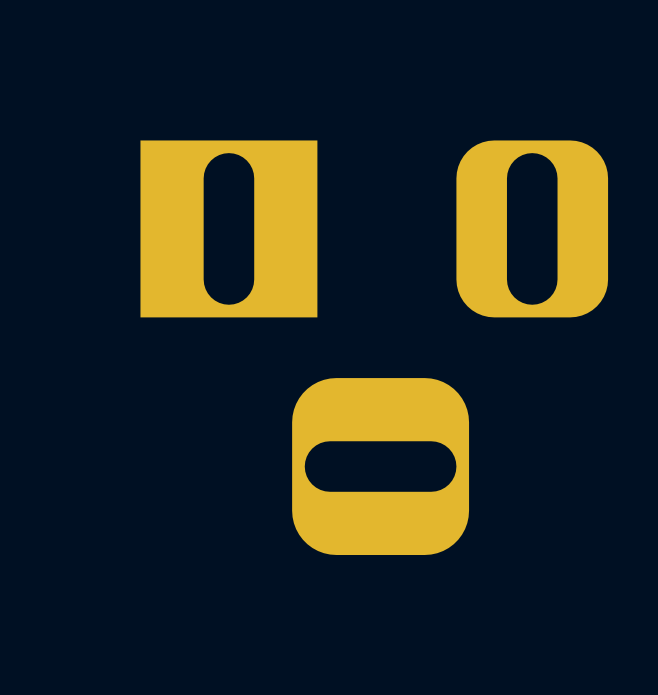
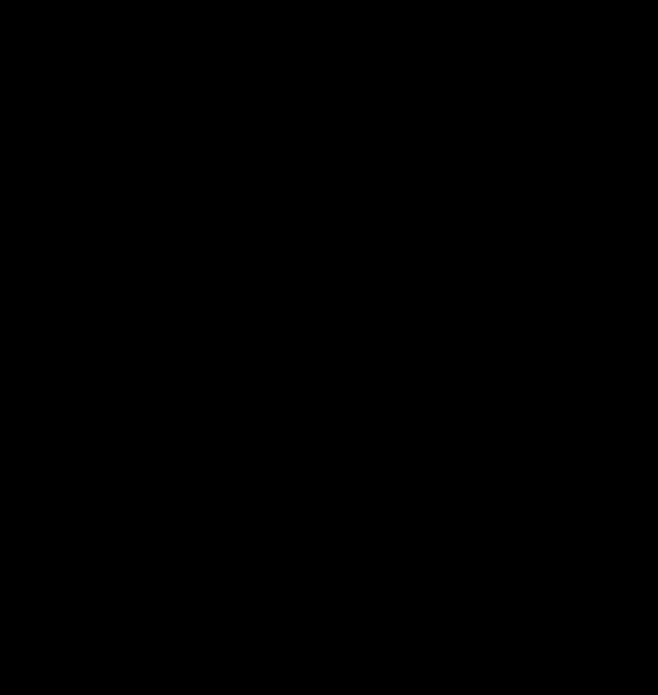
part: (374, 347) -> none

